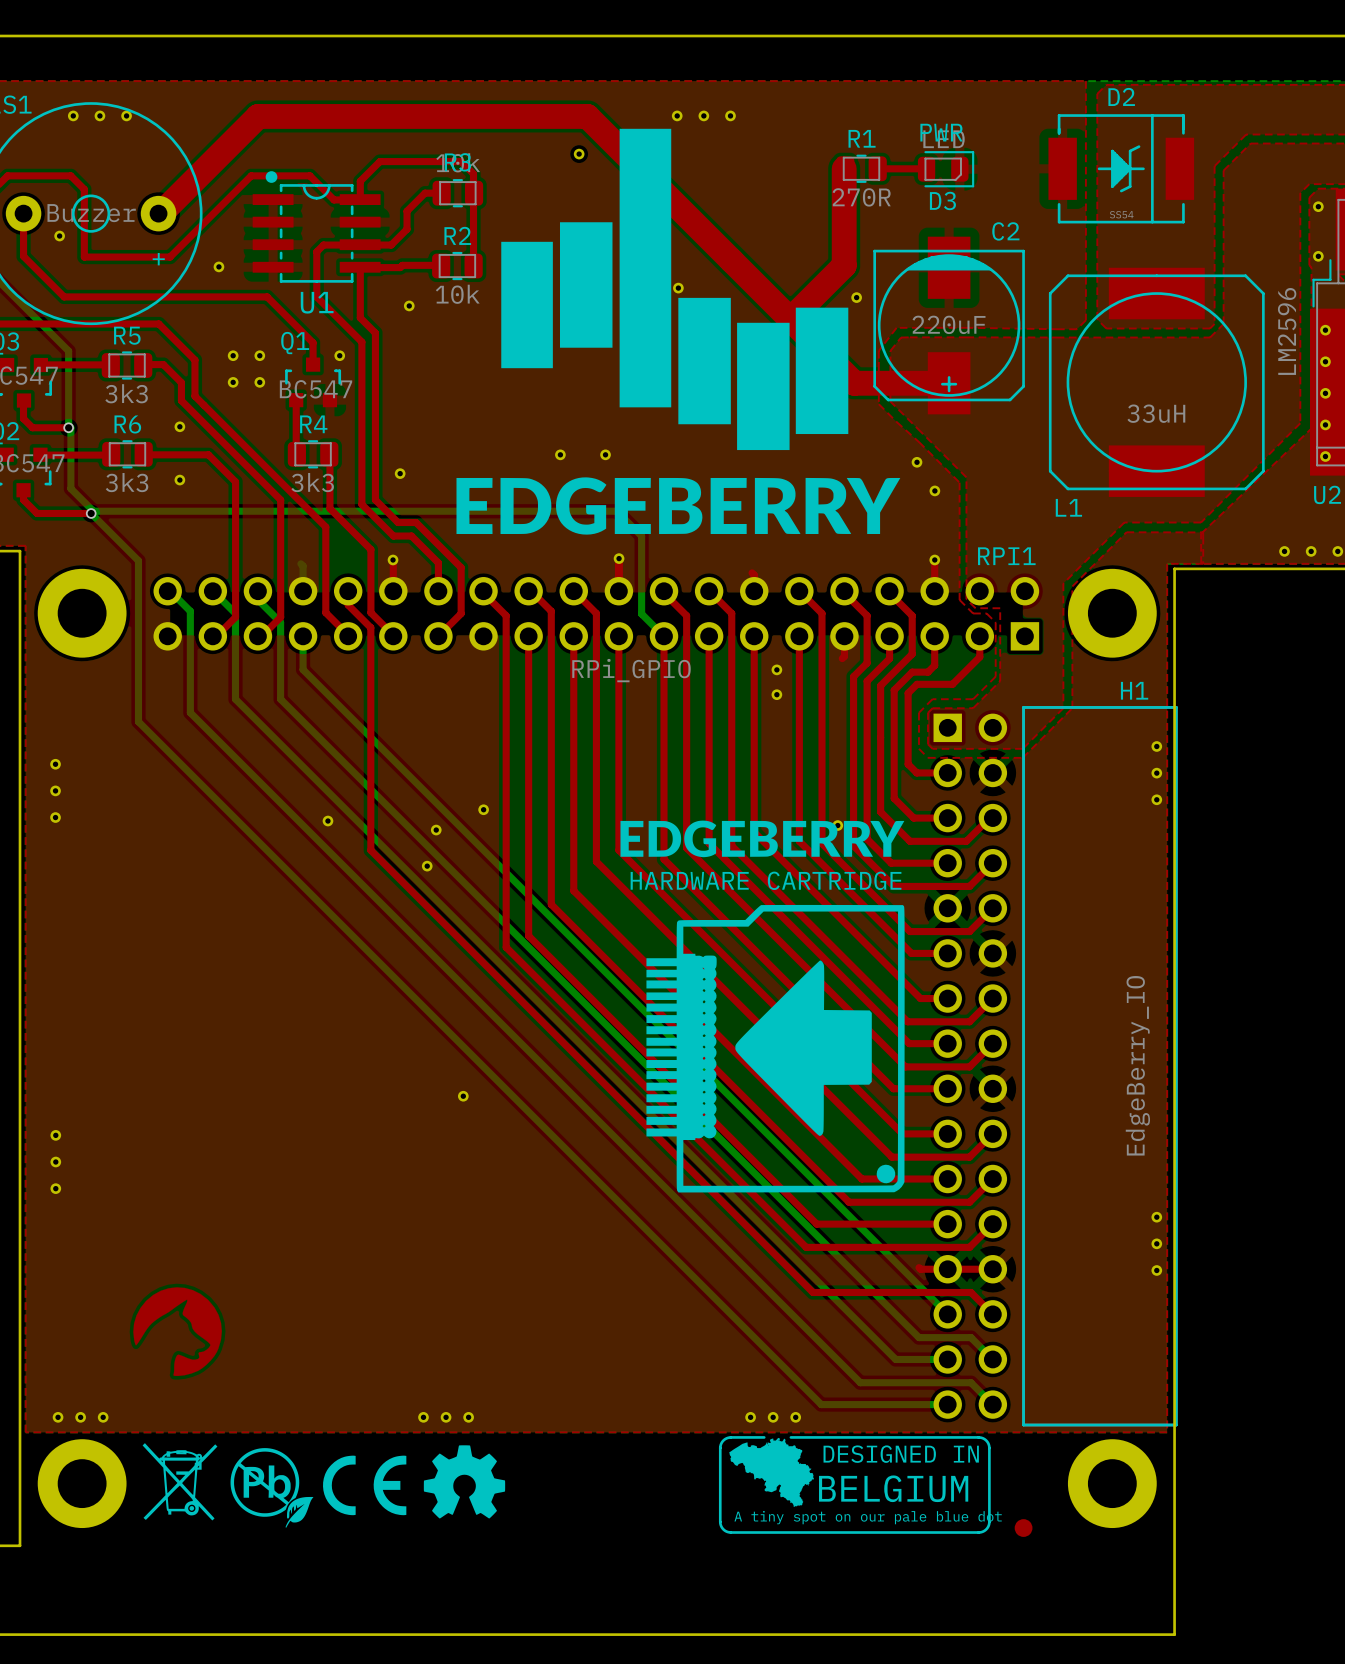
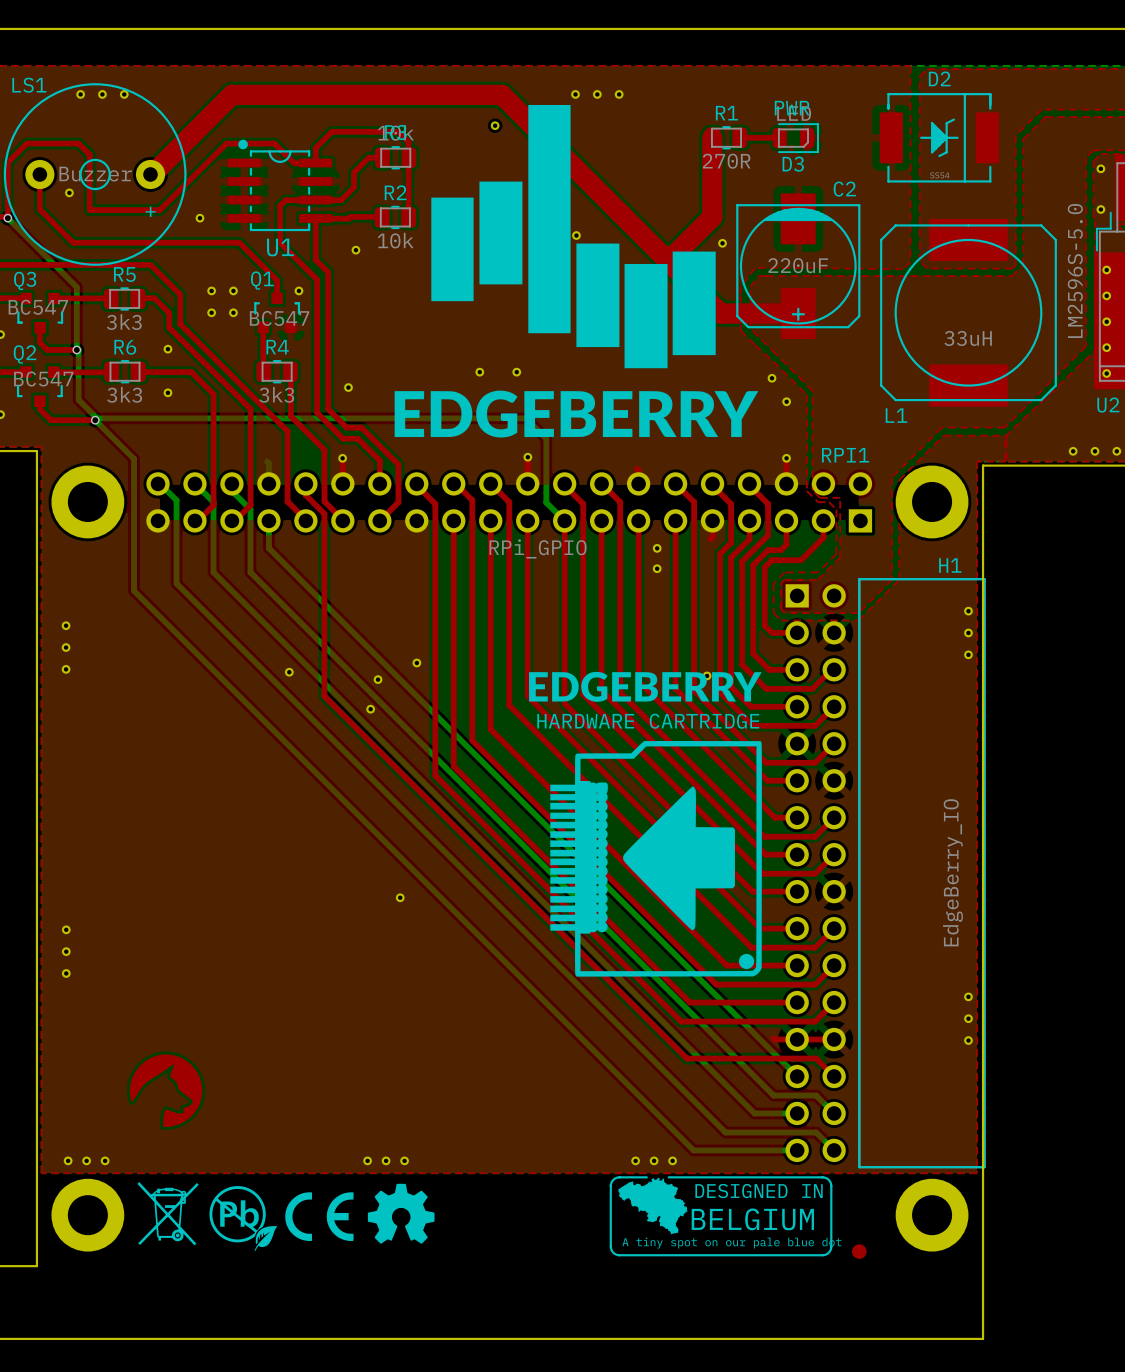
U2 value: LM2596 (1287, 331) -> LM2596S-5.0 (1075, 270)

